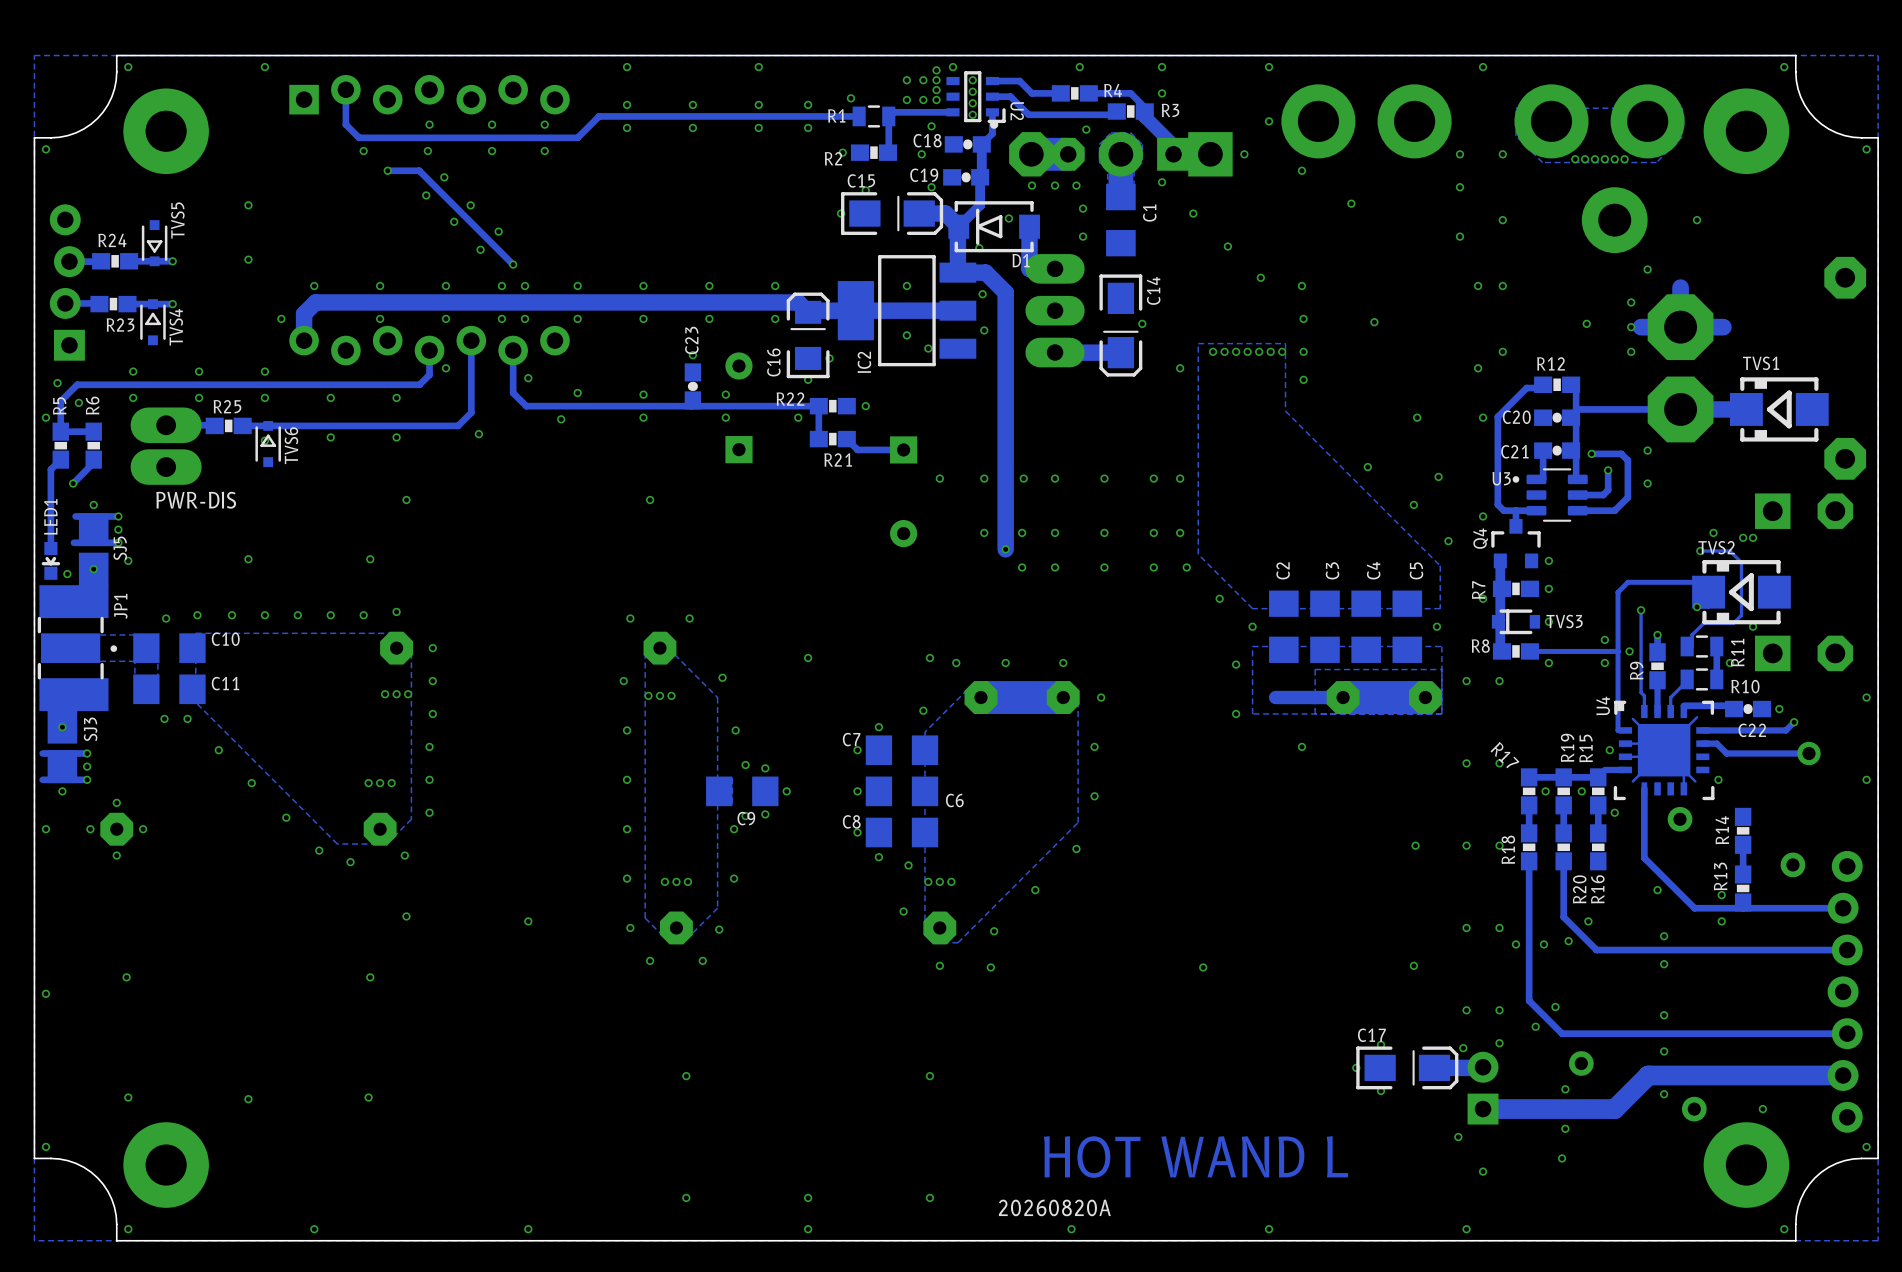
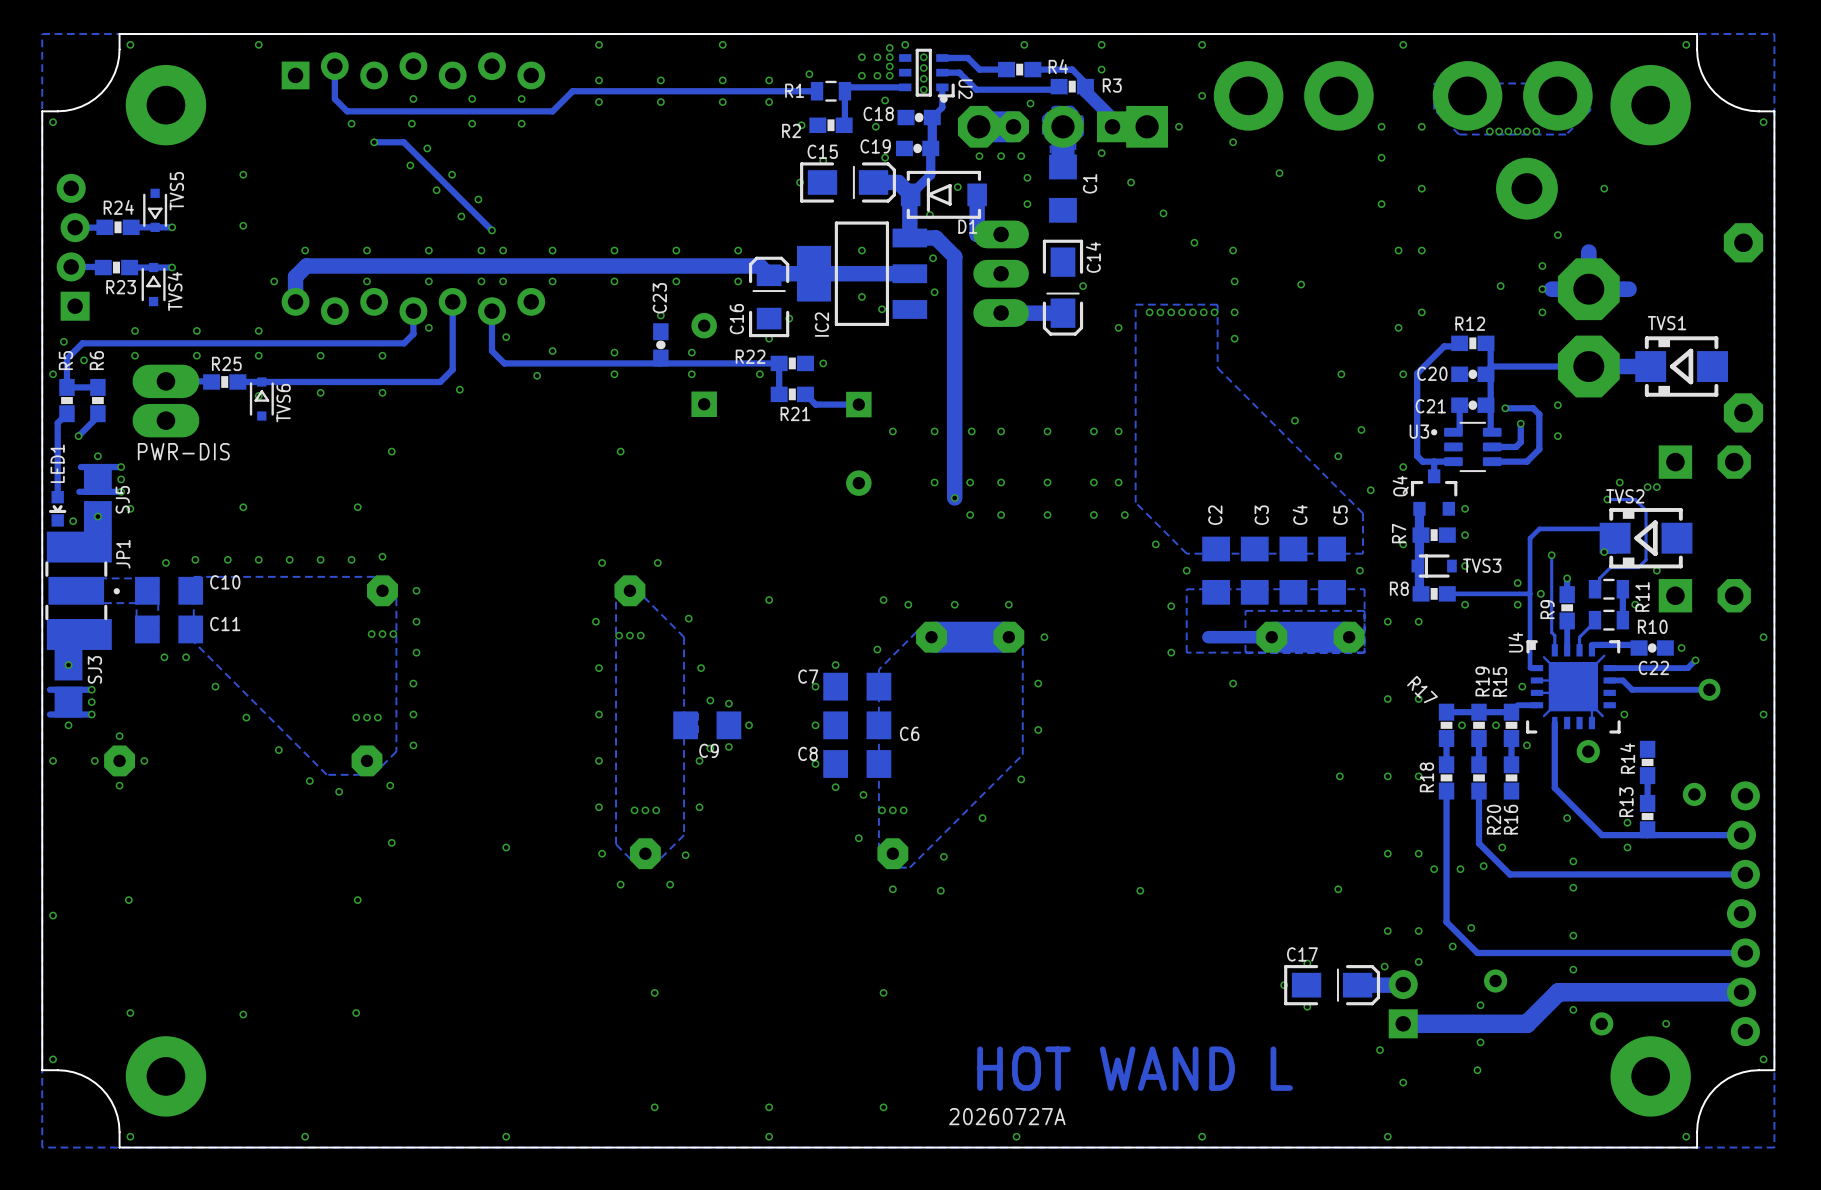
drawing shape: [998, 1136, 1349, 1217] -> [949, 1046, 1293, 1126]

